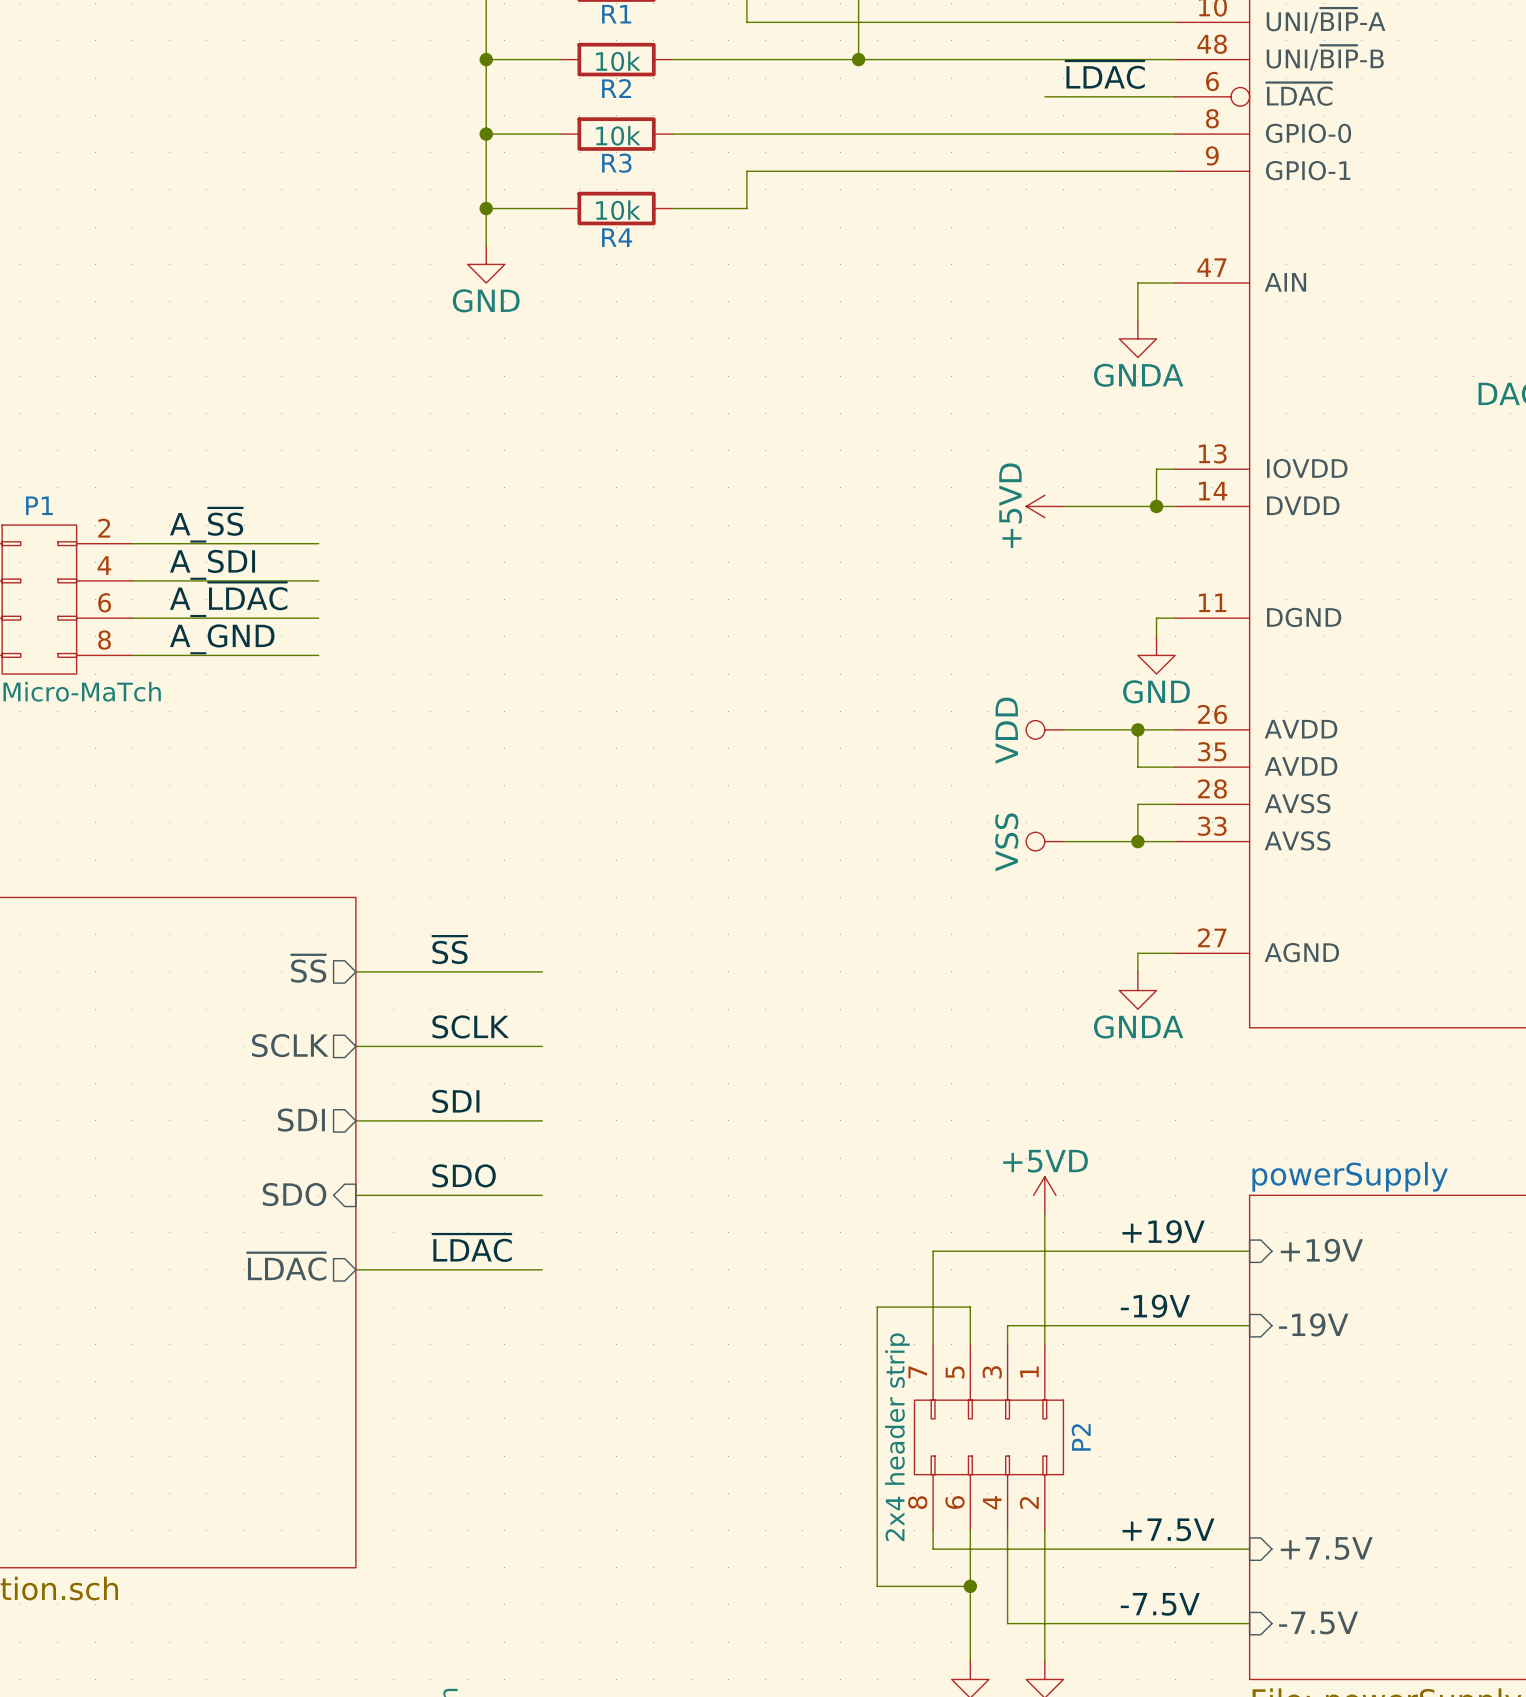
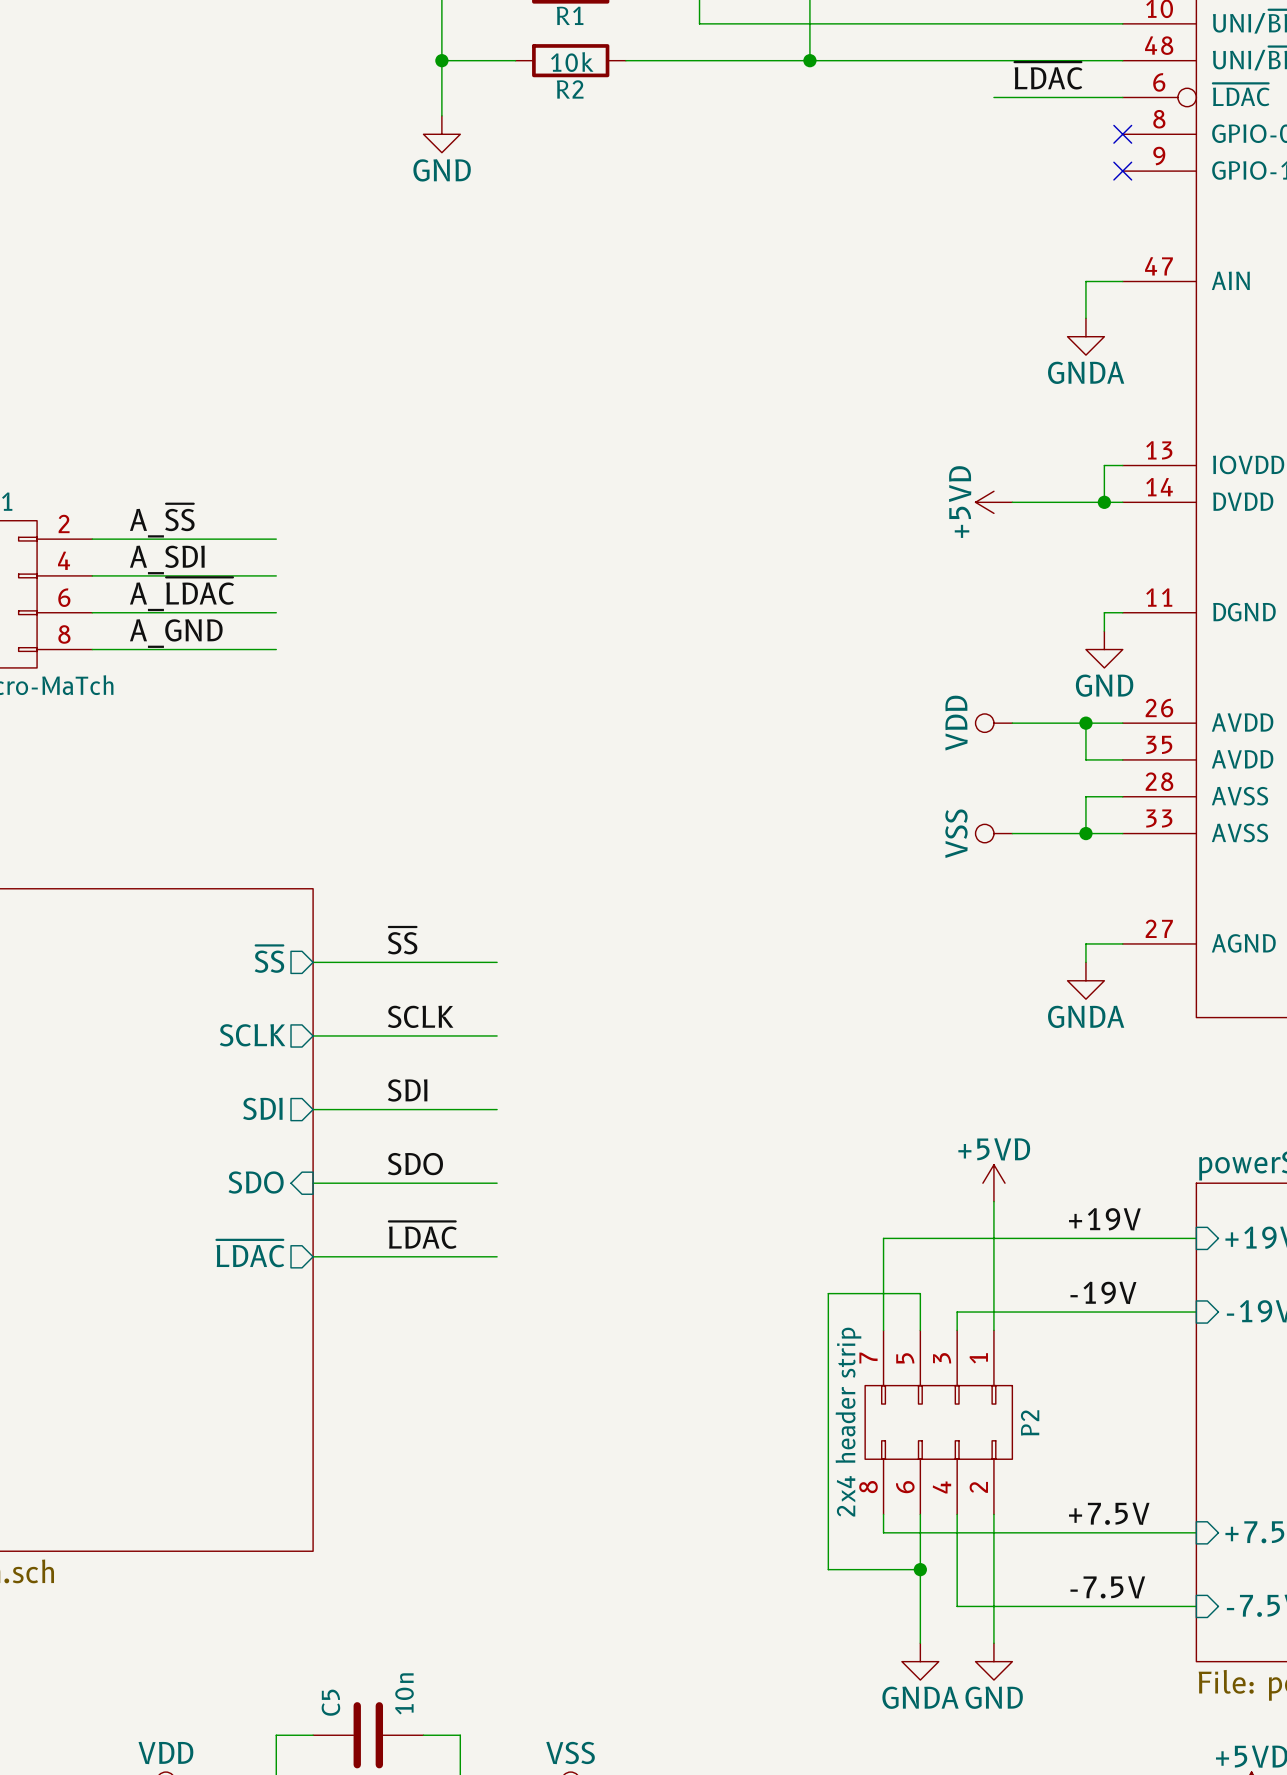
wire: (486, 115) (486, 245) -> none
wire: (486, 134) (560, 134) -> none
junction: (486, 134) -> none
R3: 10k (616, 134) -> none
wire: (672, 134) (1175, 134) -> none
no-connect mark: none -> (1122, 134)
wire: (1175, 171) (746, 171) (746, 208) (672, 208) -> none
no-connect mark: none -> (1122, 171)
wire: (486, 208) (560, 208) -> none
junction: (486, 208) -> none
R4: 10k (616, 208) -> none
power symbol position: GND (486, 264) -> GND (441, 134)

